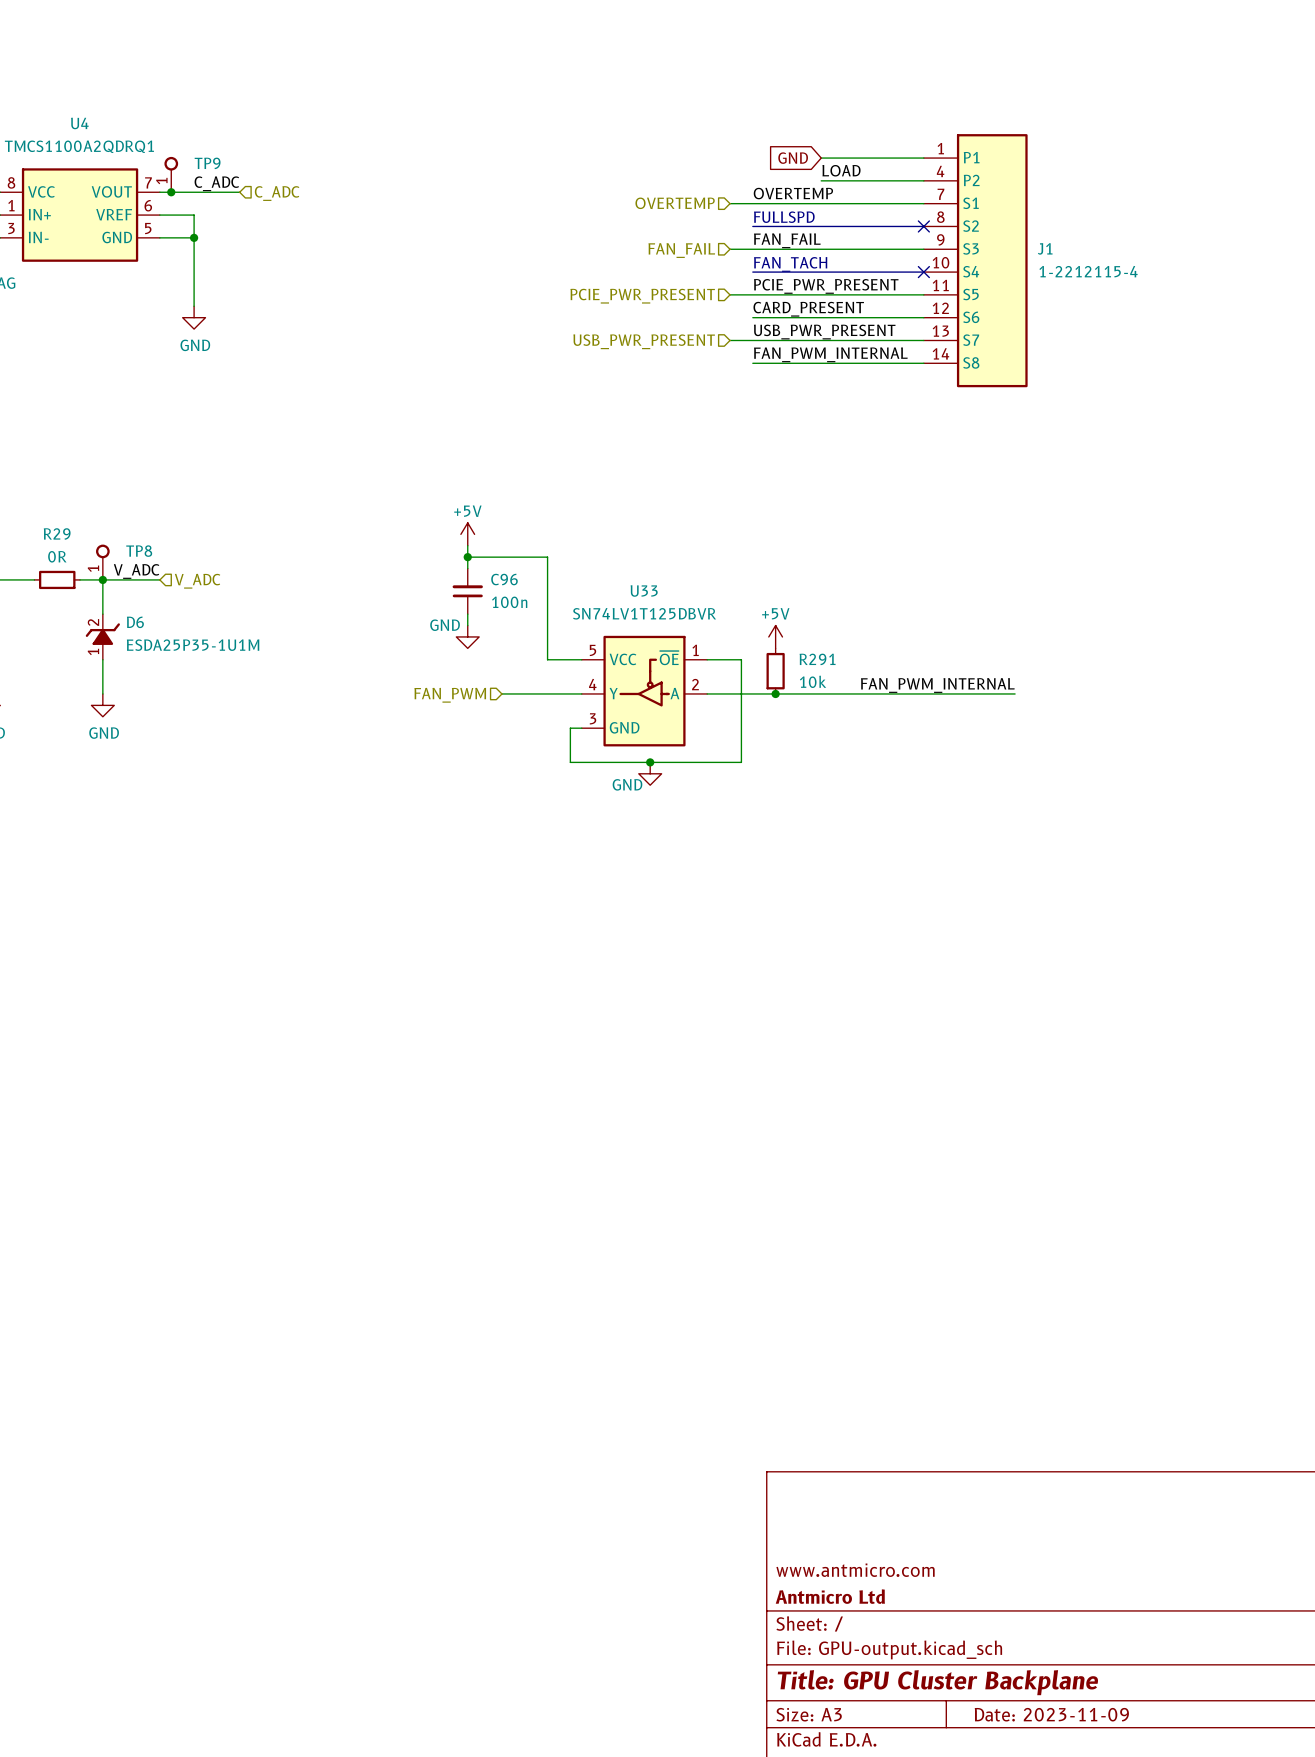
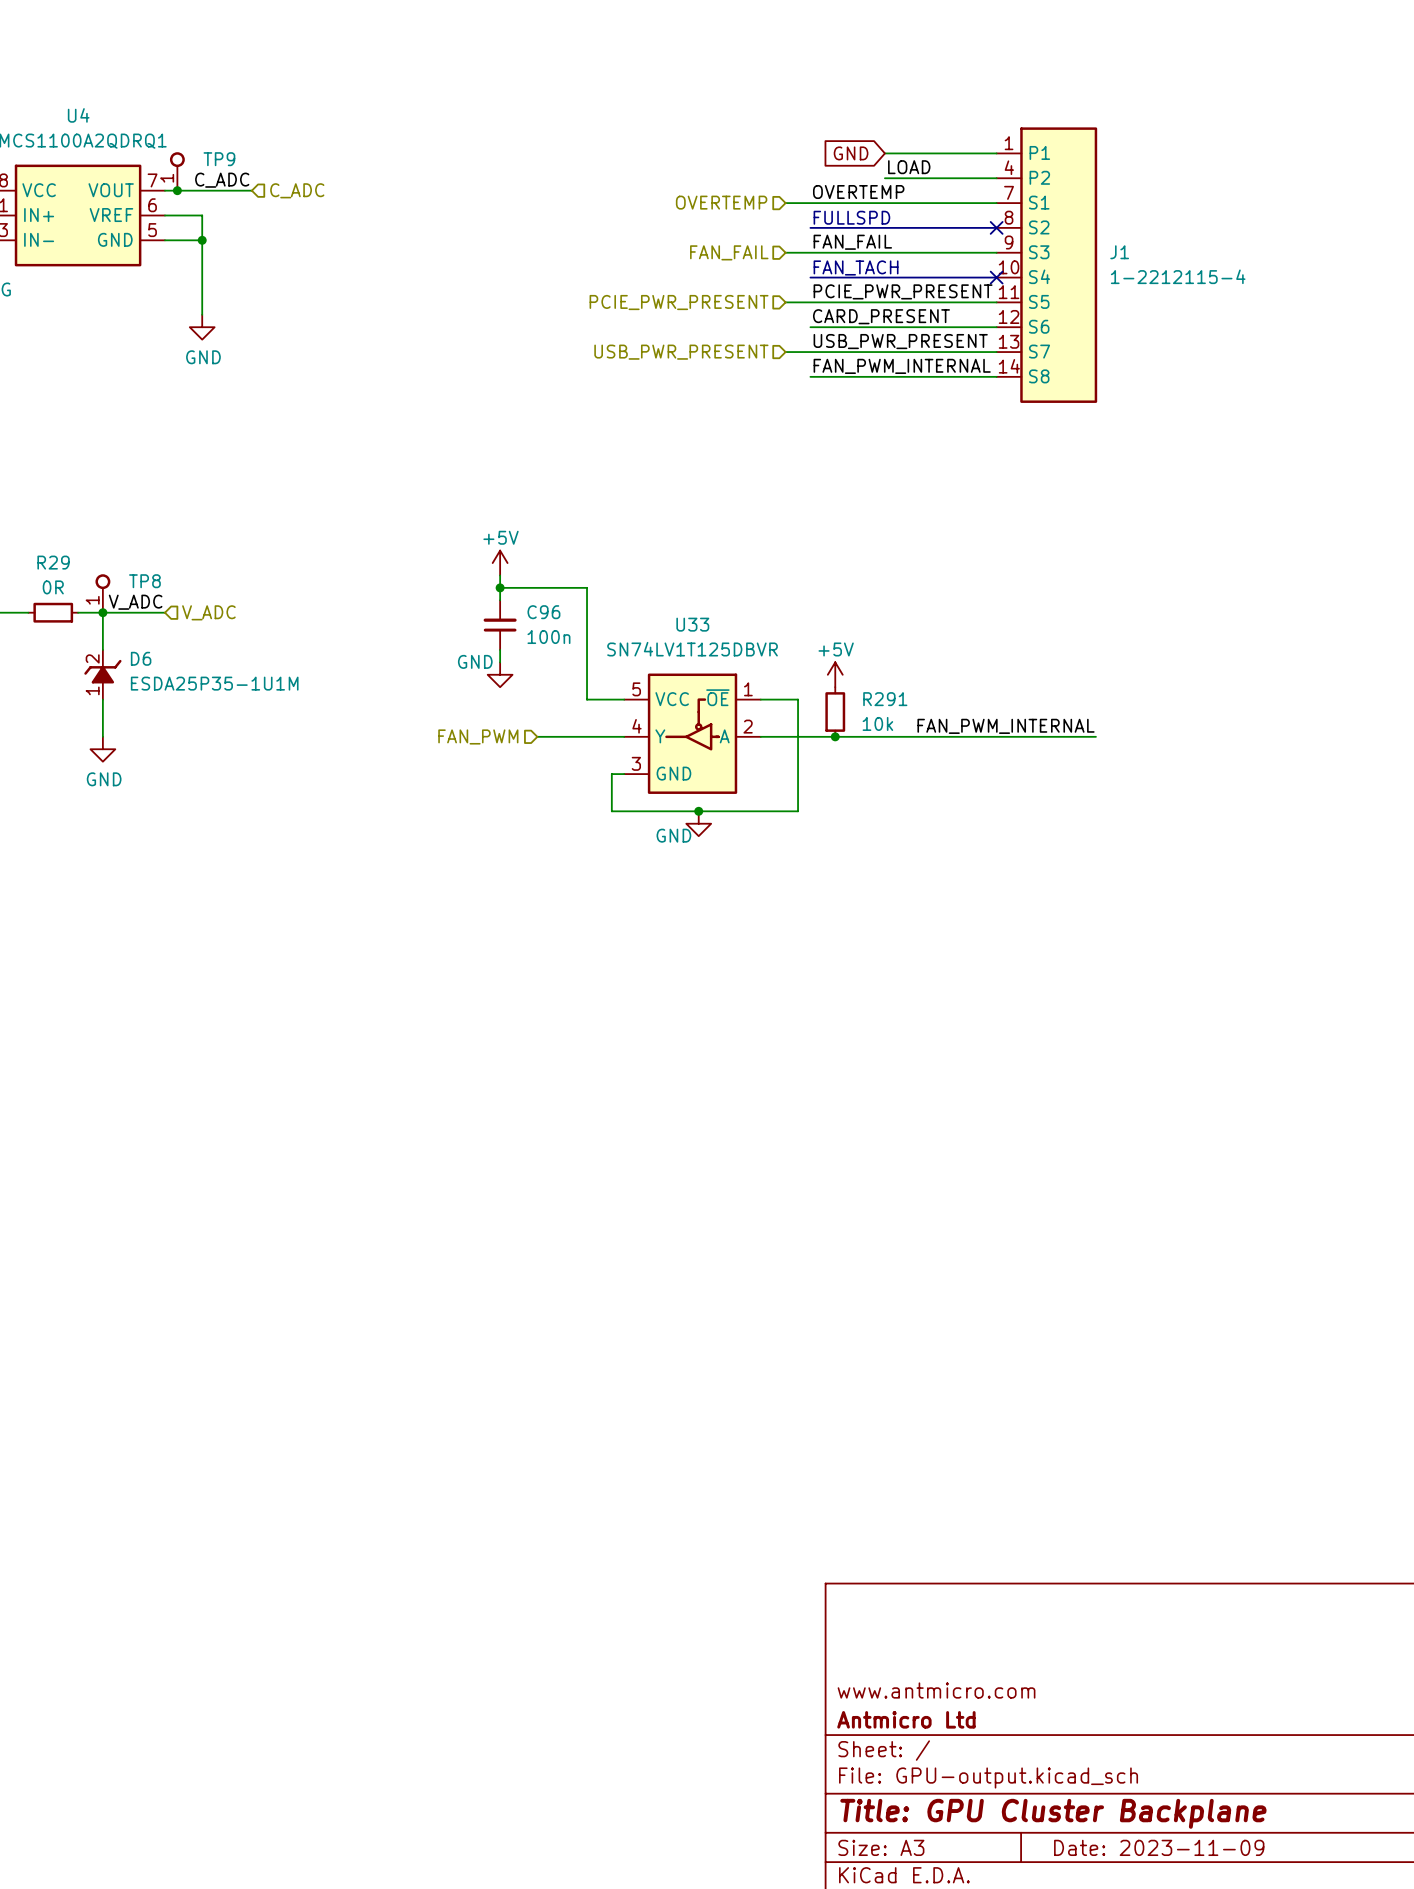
J1 symbol: [923, 134, 1028, 388] -> [996, 127, 1098, 403]

